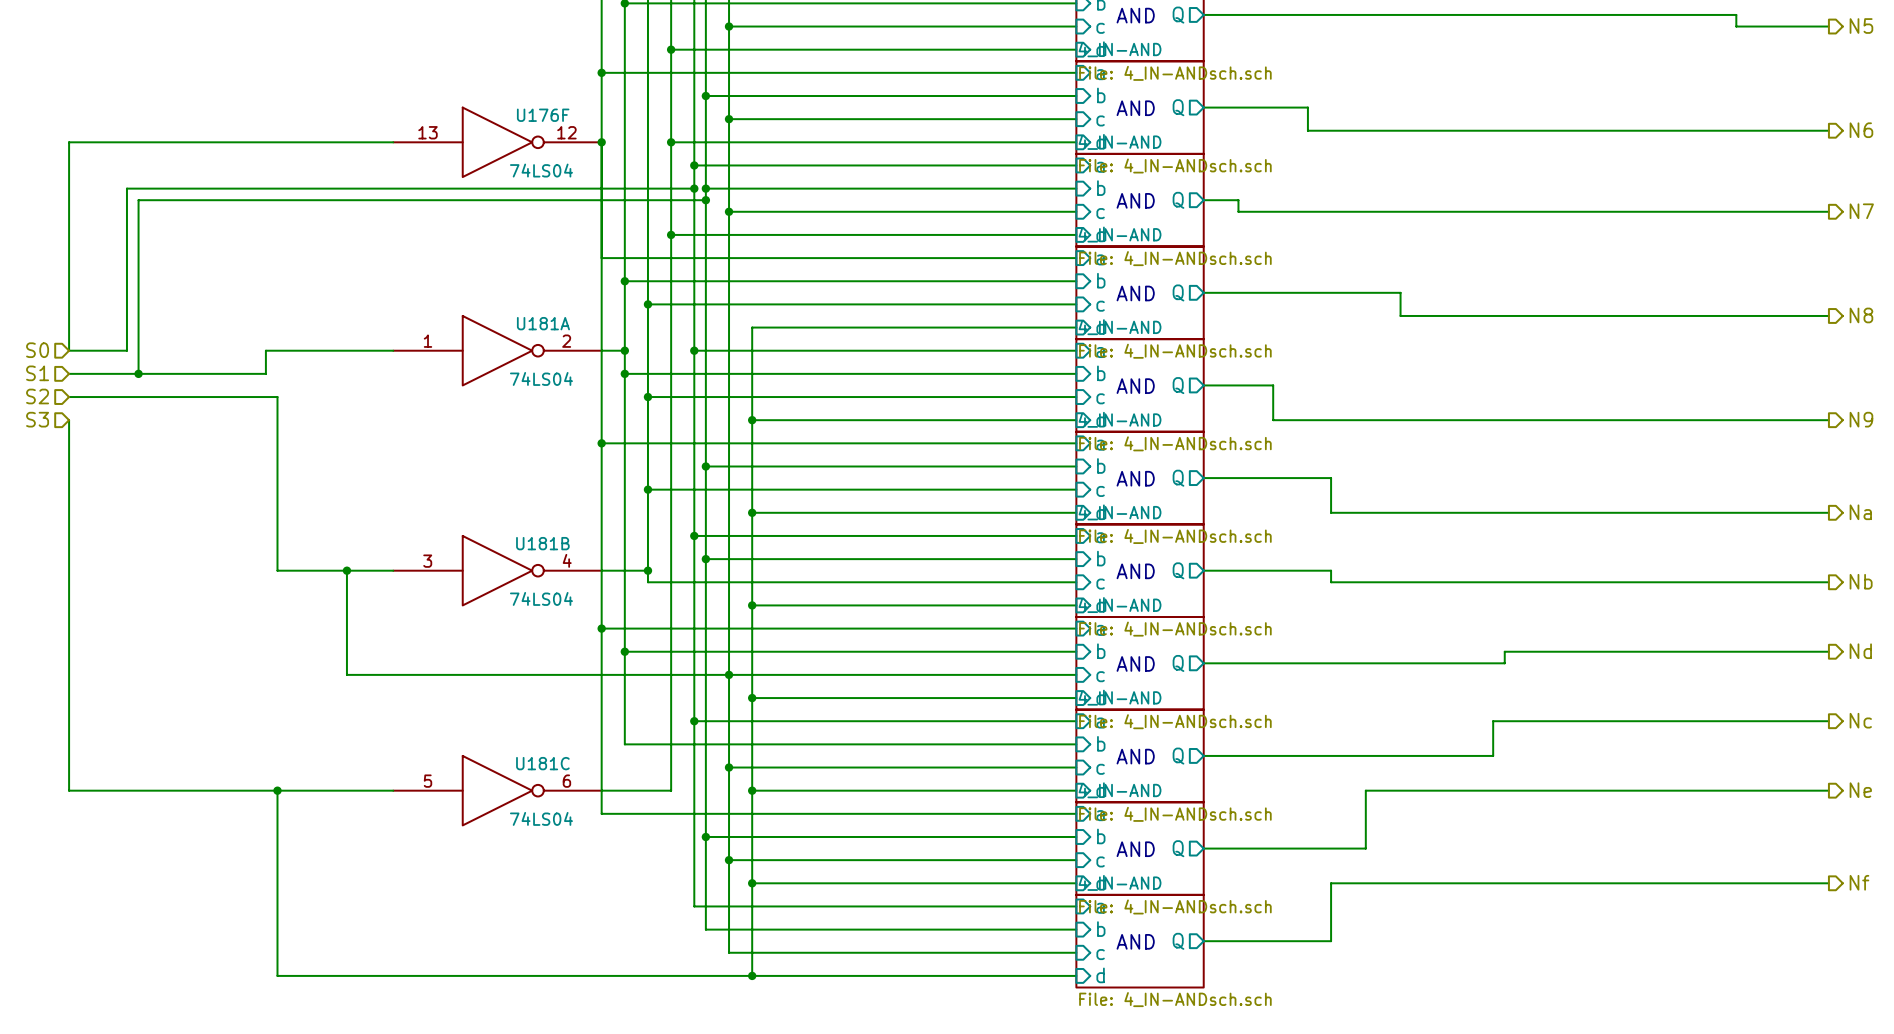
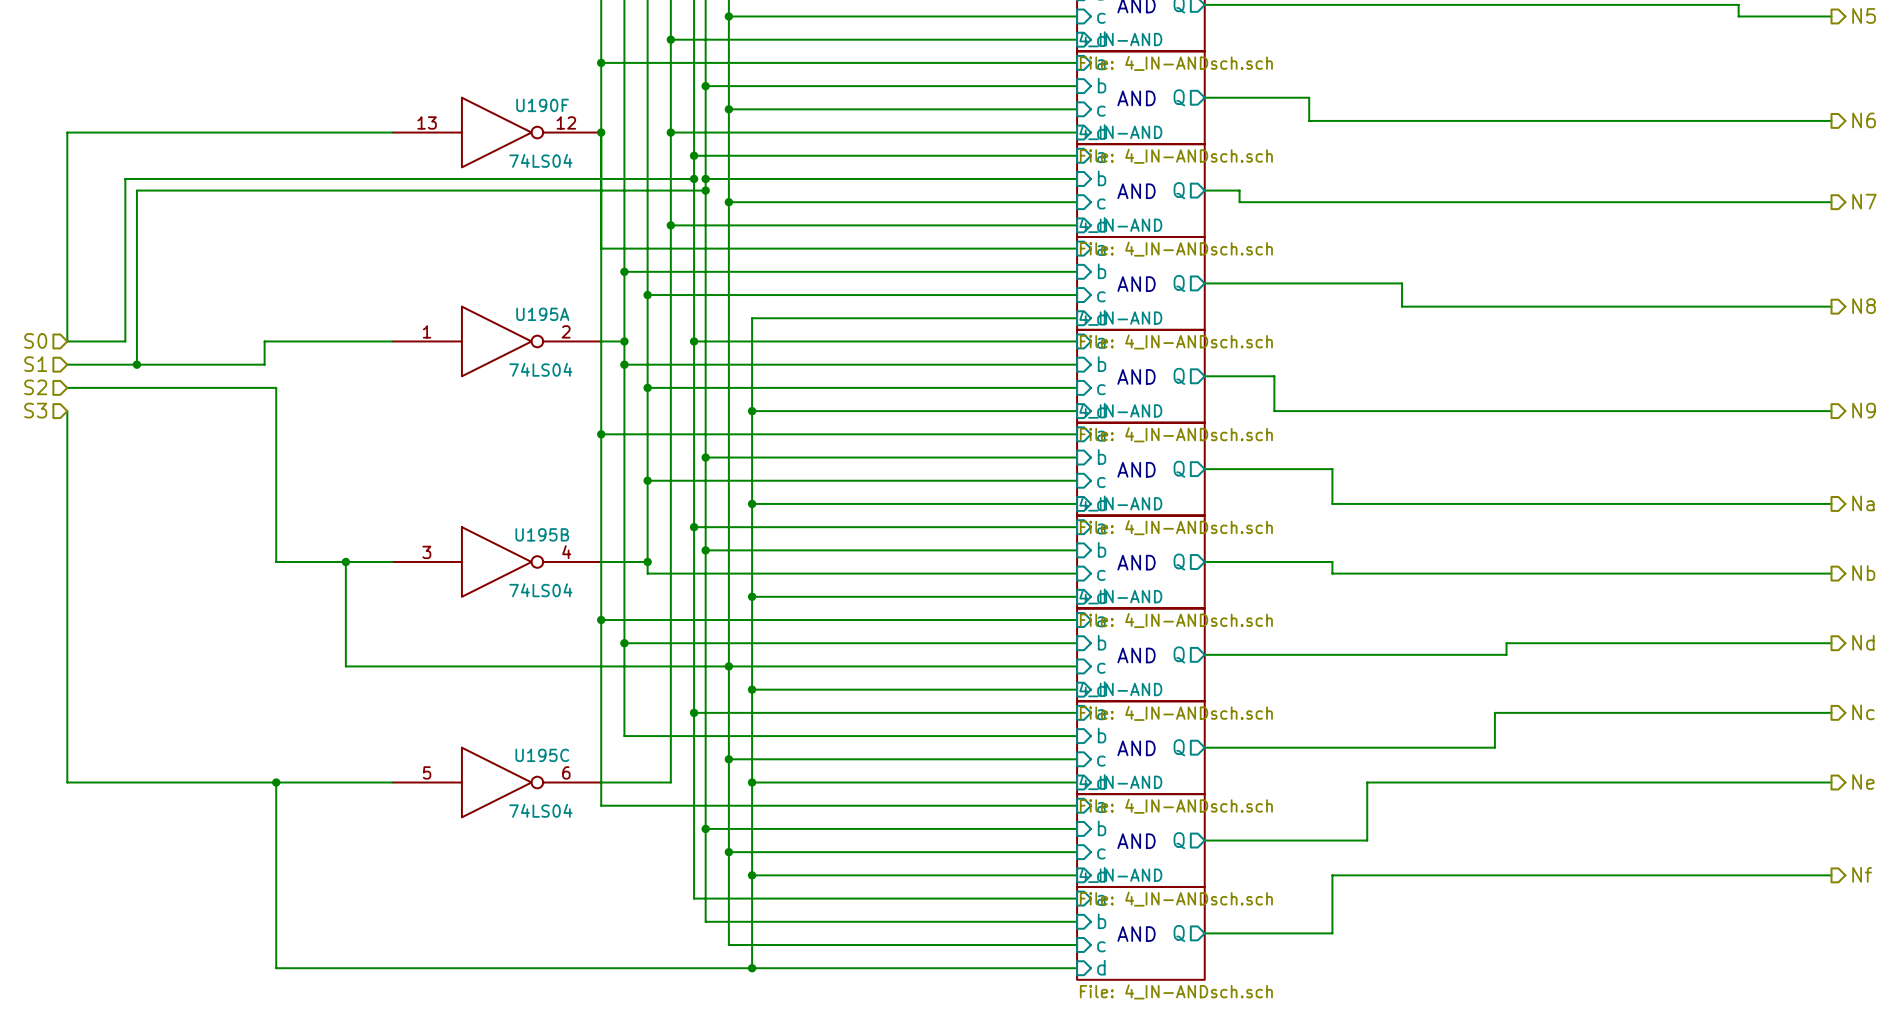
U176F name: U176F (543, 115) -> U190F (542, 105)
U181A name: U181A (543, 323) -> U195A (542, 314)
U181B name: U181B (542, 543) -> U195B (542, 534)
U181C name: U181C (542, 763) -> U195C (542, 755)

